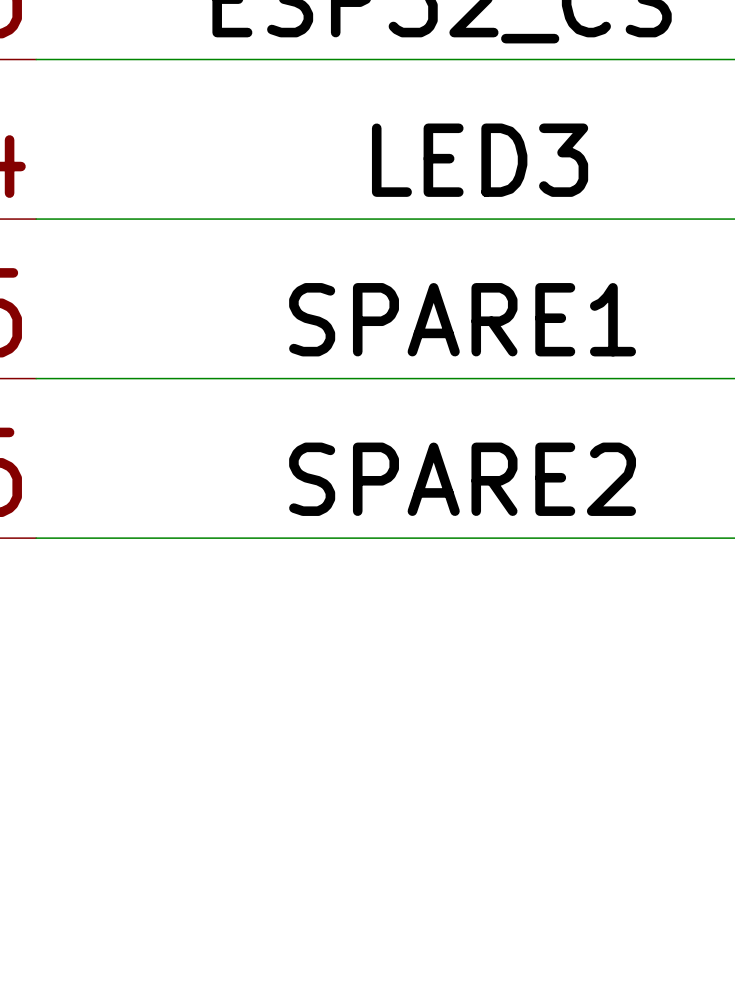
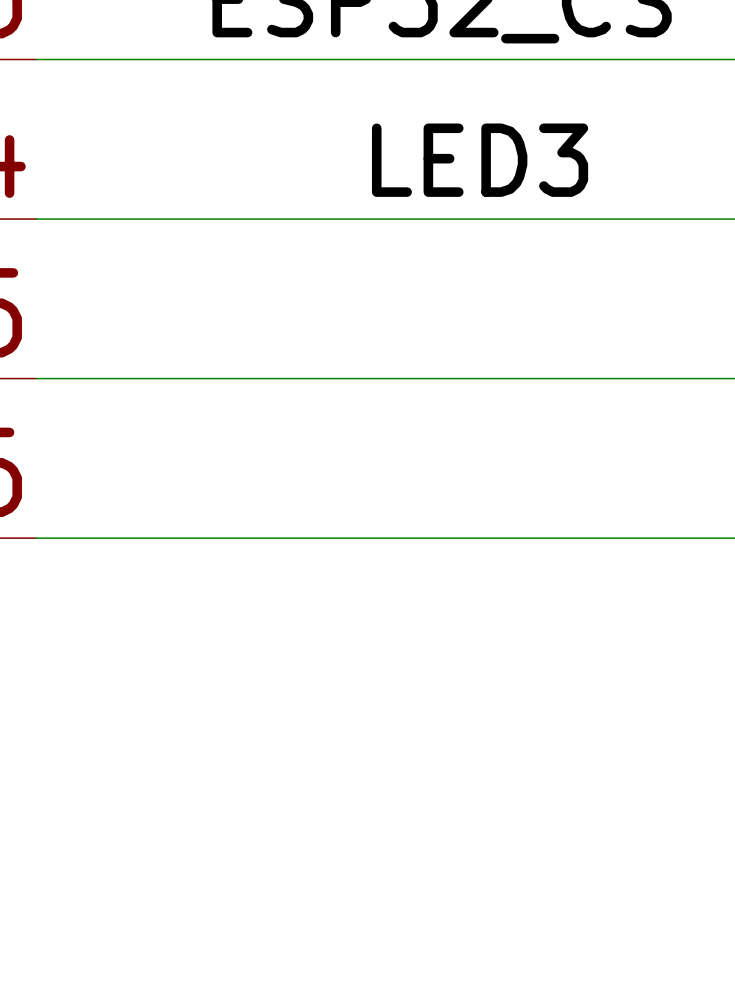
label: SPARE1 (462, 319) -> none
label: SPARE2 (462, 479) -> none

